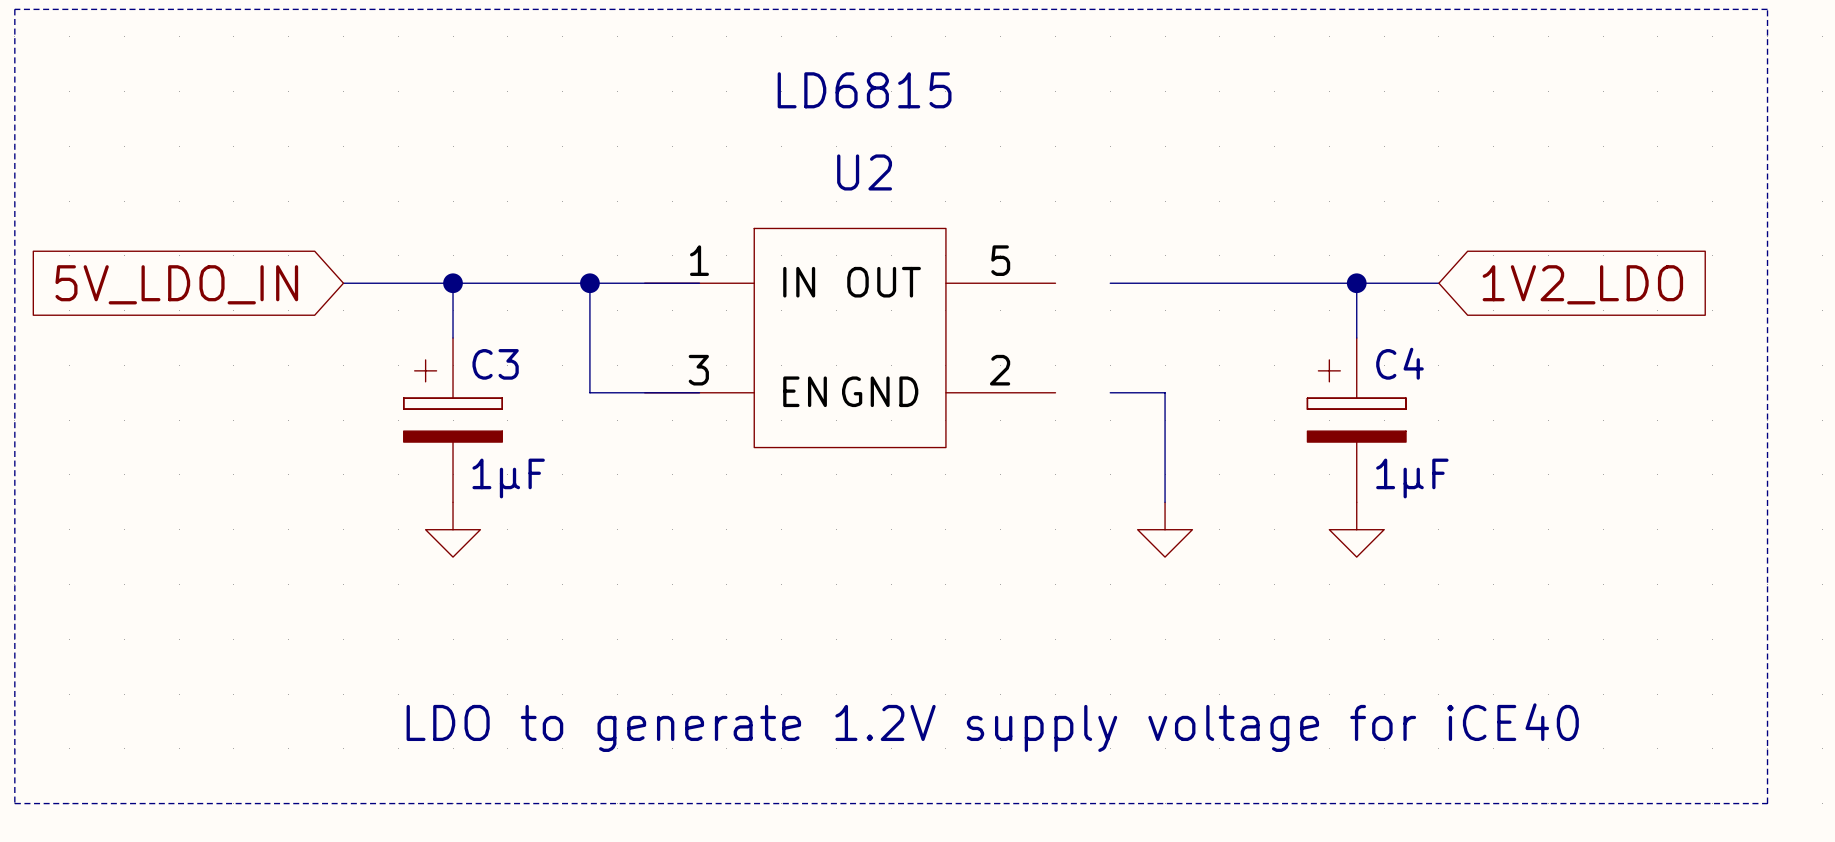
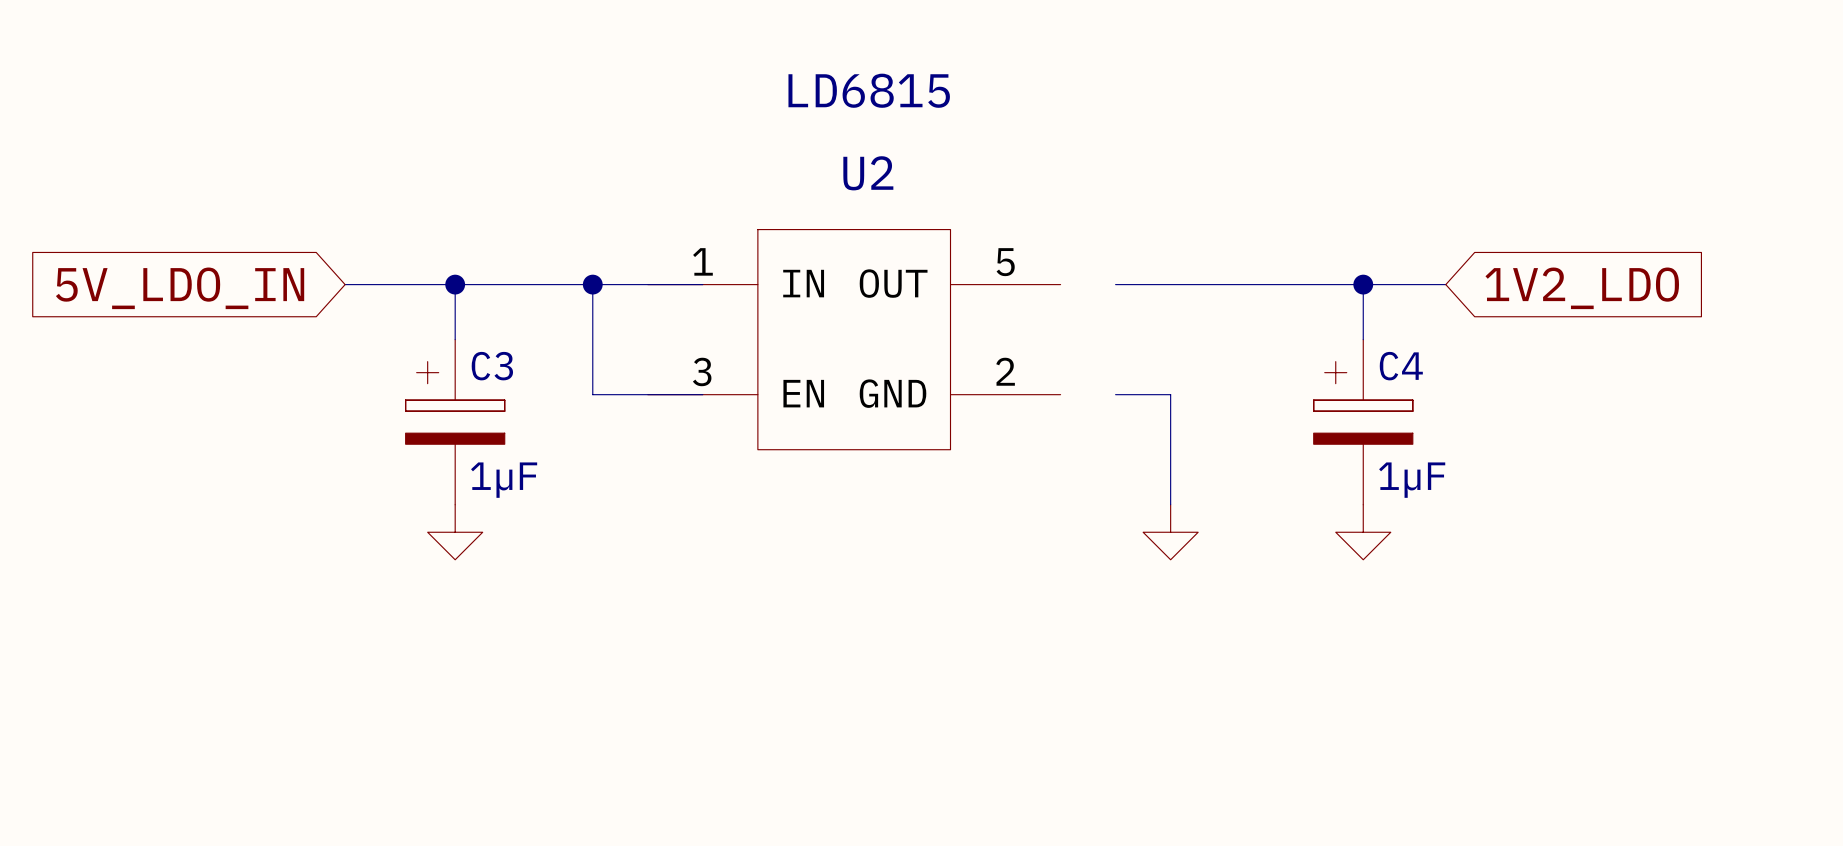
line: (14, 9) (14, 803) (1767, 803) (1767, 9) (14, 9) -> none
text: LDO to generate 1.2V supply voltage for iCE40 (992, 727) -> none

